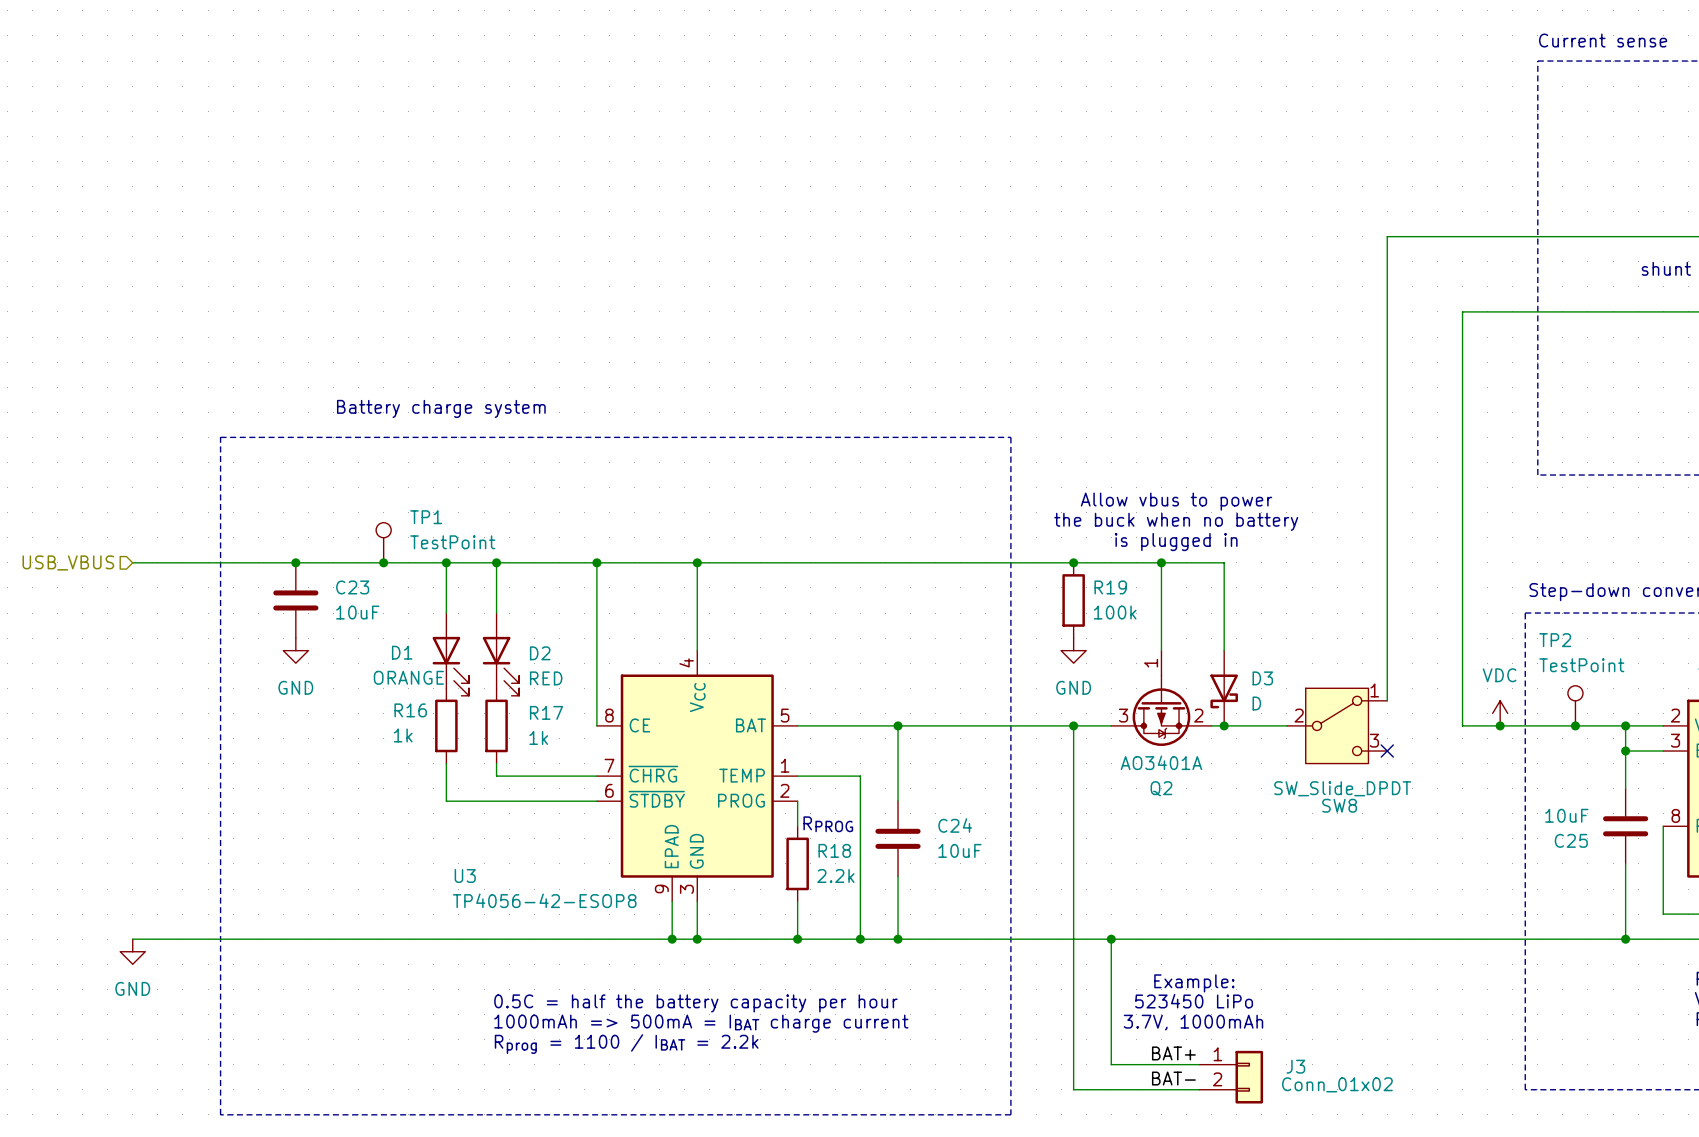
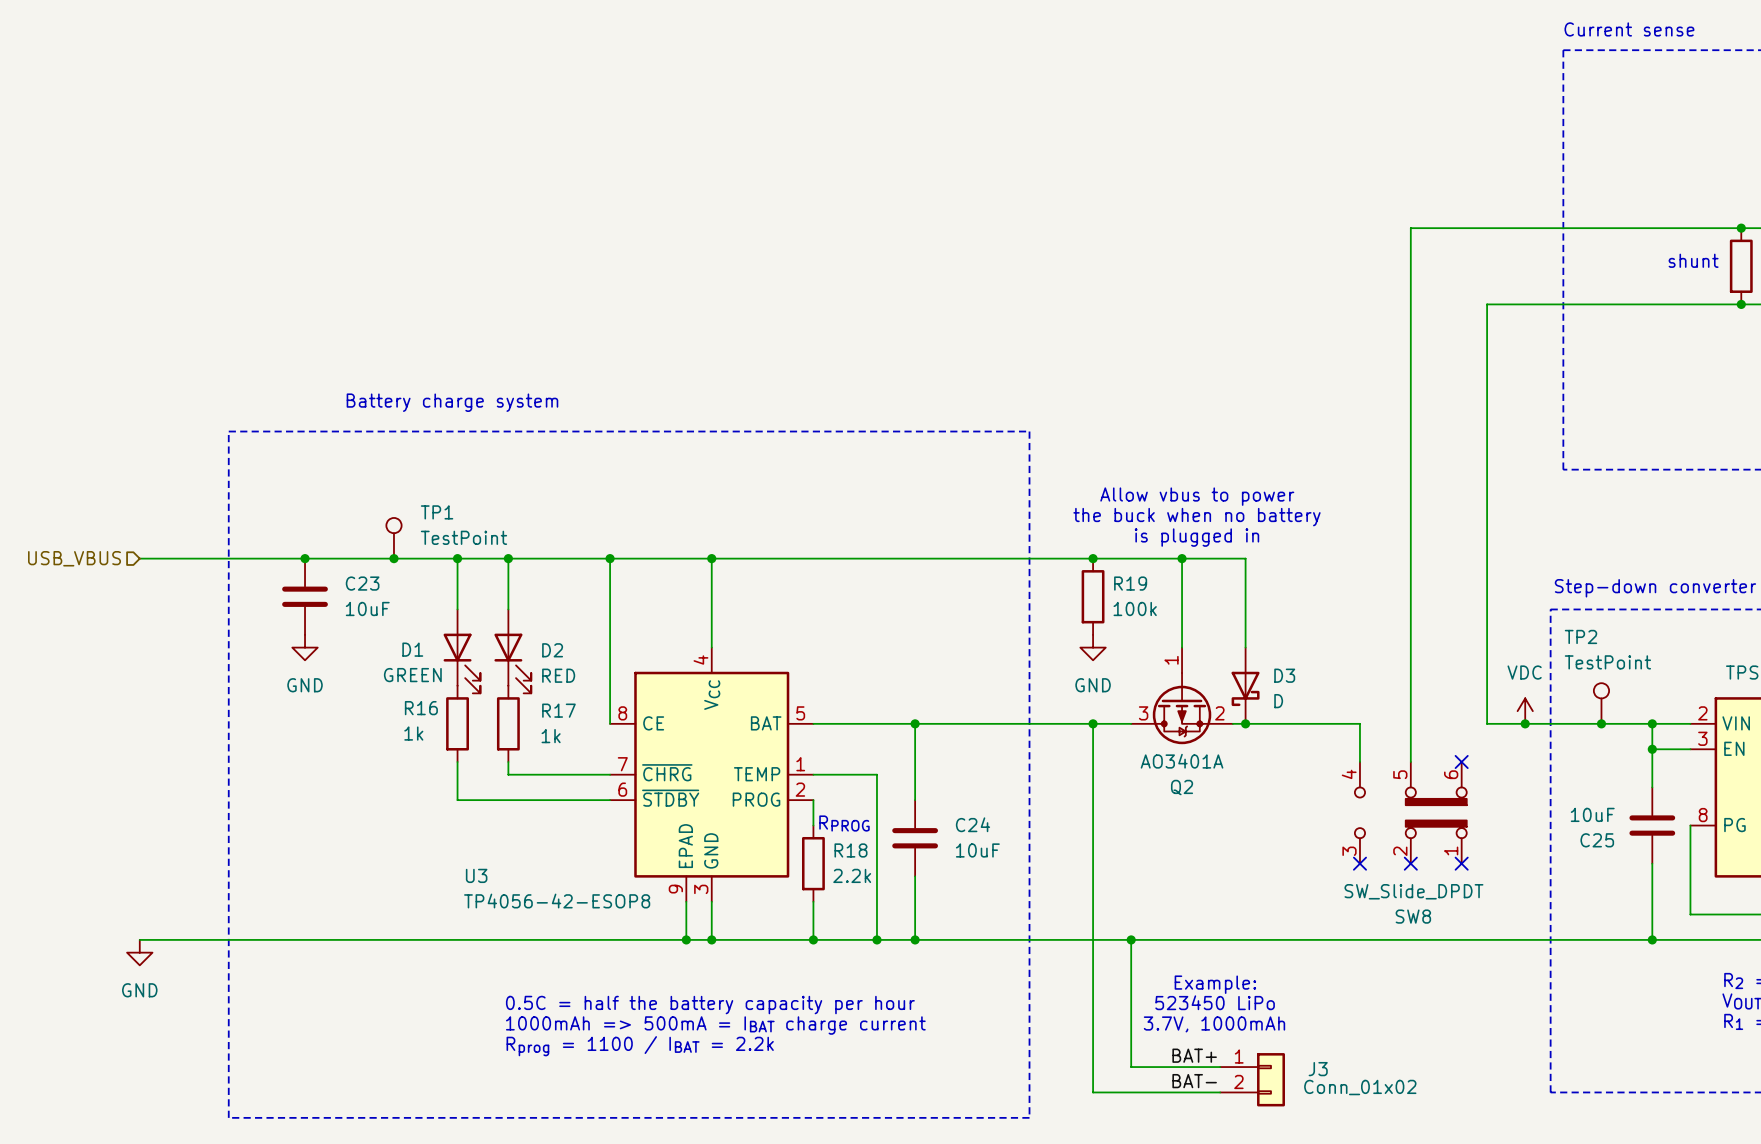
D1 value: ORANGE (408, 677) -> GREEN (412, 675)
SW8 symbol: [1286, 688, 1388, 764] -> [1354, 761, 1467, 864]
wire: none -> (1410, 698) (1410, 761)
no-connect mark position: (1387, 751) -> (1461, 761)
SW8 name position: SW8 (1339, 805) -> SW8 (1413, 916)
no-connect mark: none -> (1359, 863)
no-connect mark: none -> (1410, 863)
no-connect mark: none -> (1461, 863)

